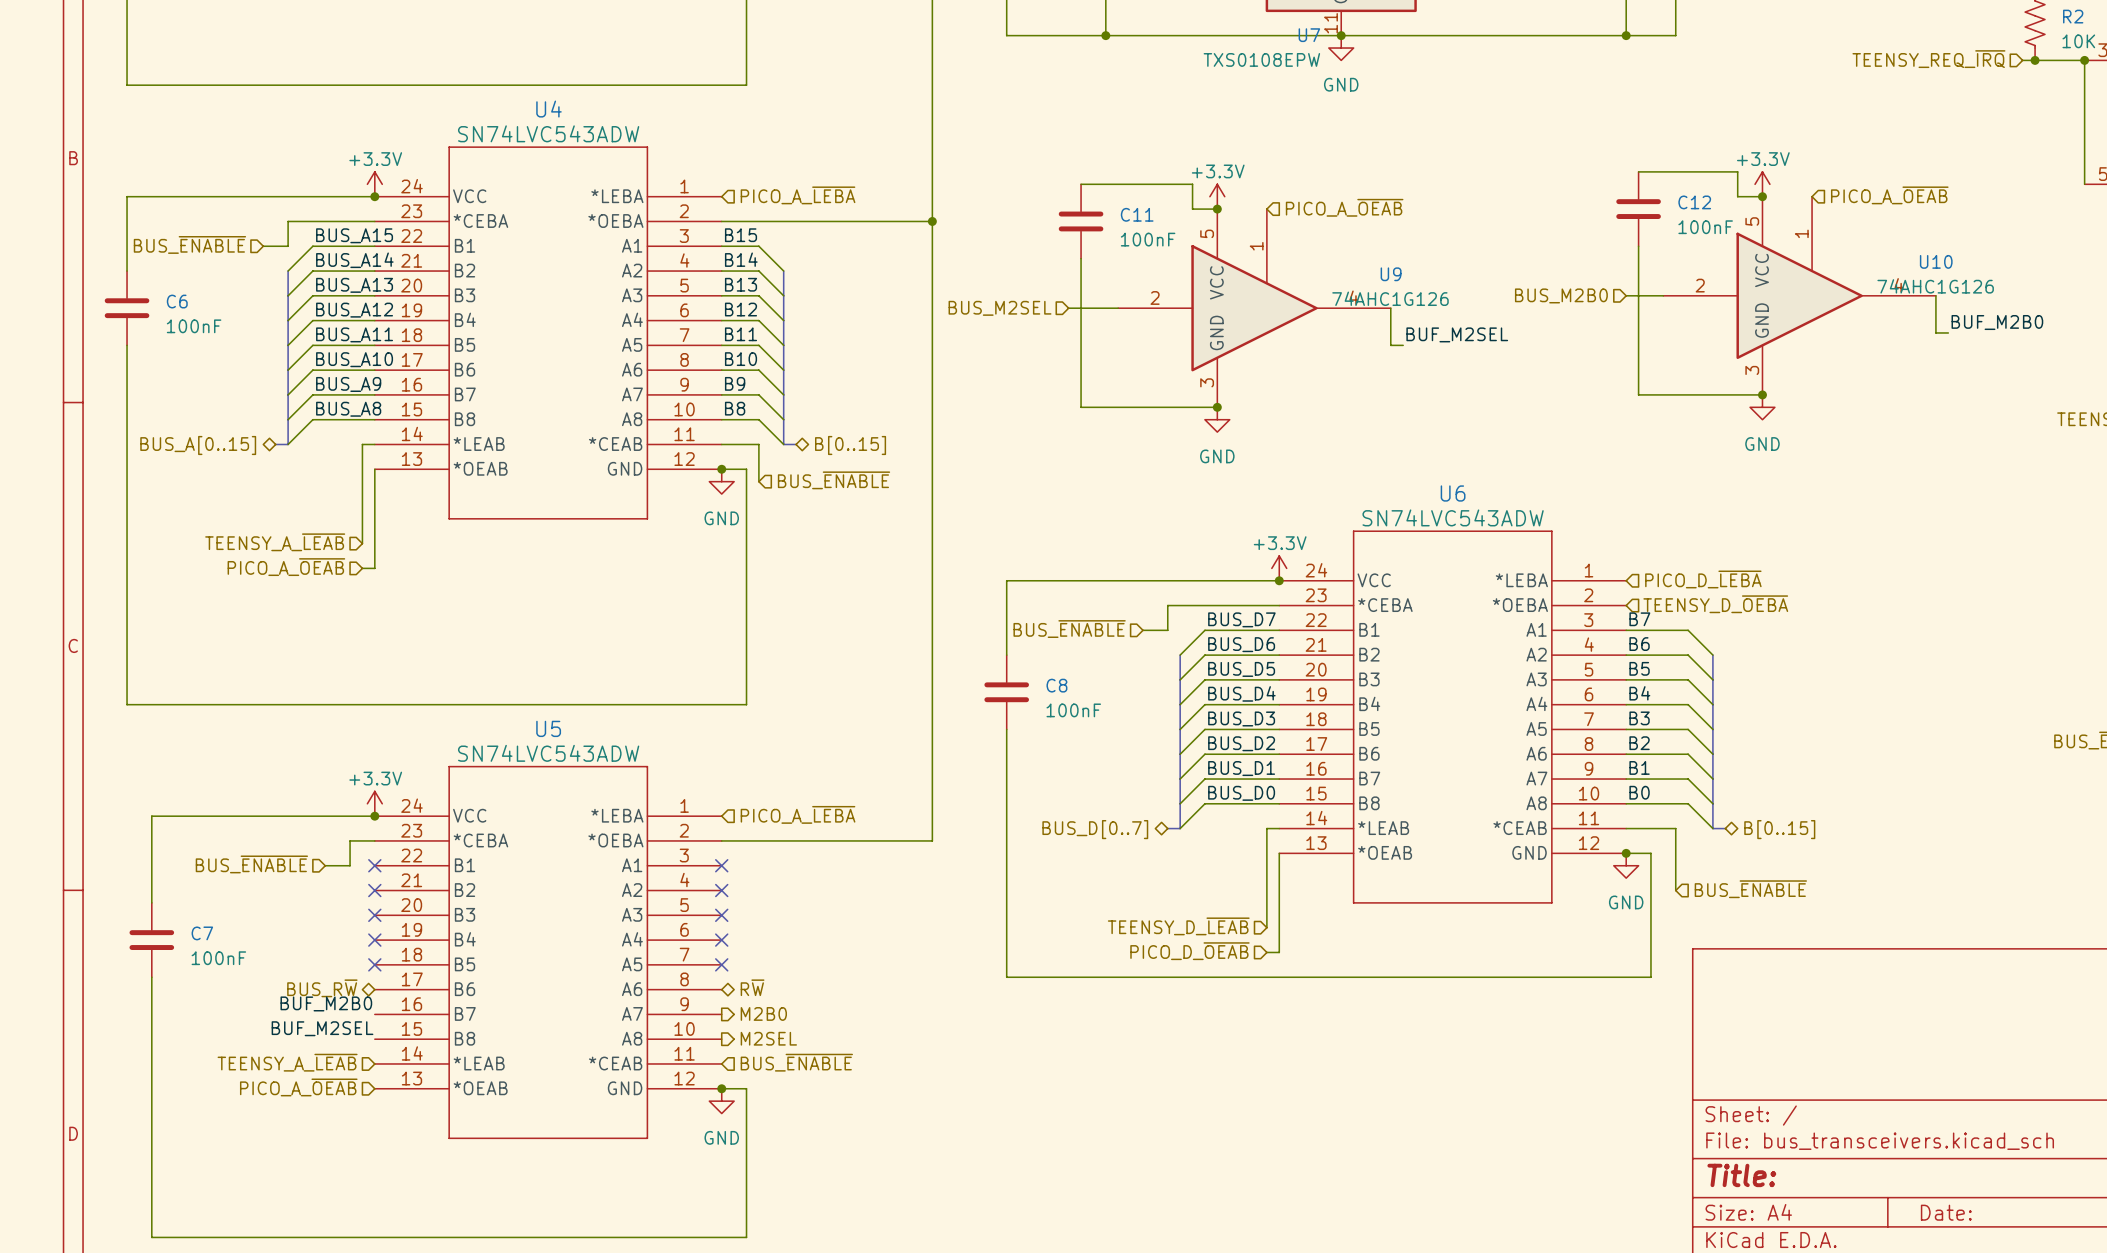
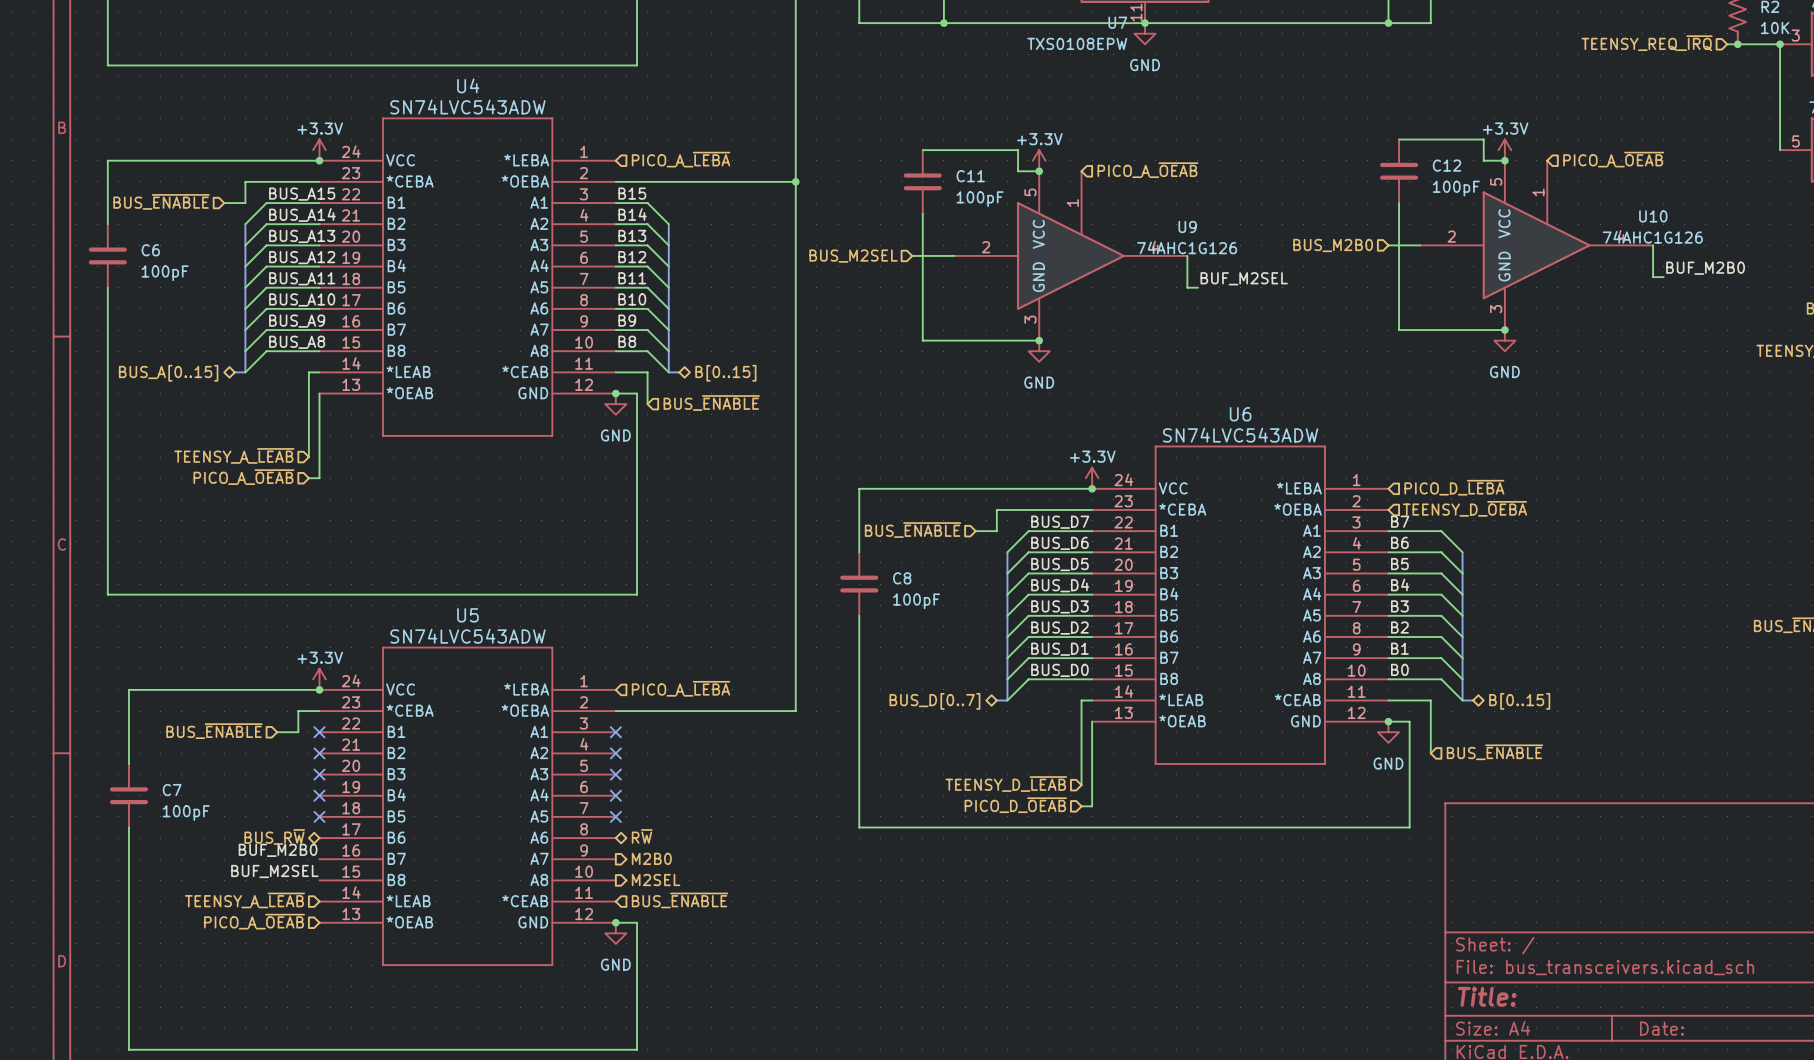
C12 value: 100nF (1705, 227) -> 100pF (1456, 188)
C11 value: 100nF (1148, 239) -> 100pF (980, 199)
C6 value: 100nF (194, 326) -> 100pF (165, 273)
C8 value: 100nF (1073, 710) -> 100pF (916, 601)
C7 value: 100nF (218, 958) -> 100pF (186, 812)

